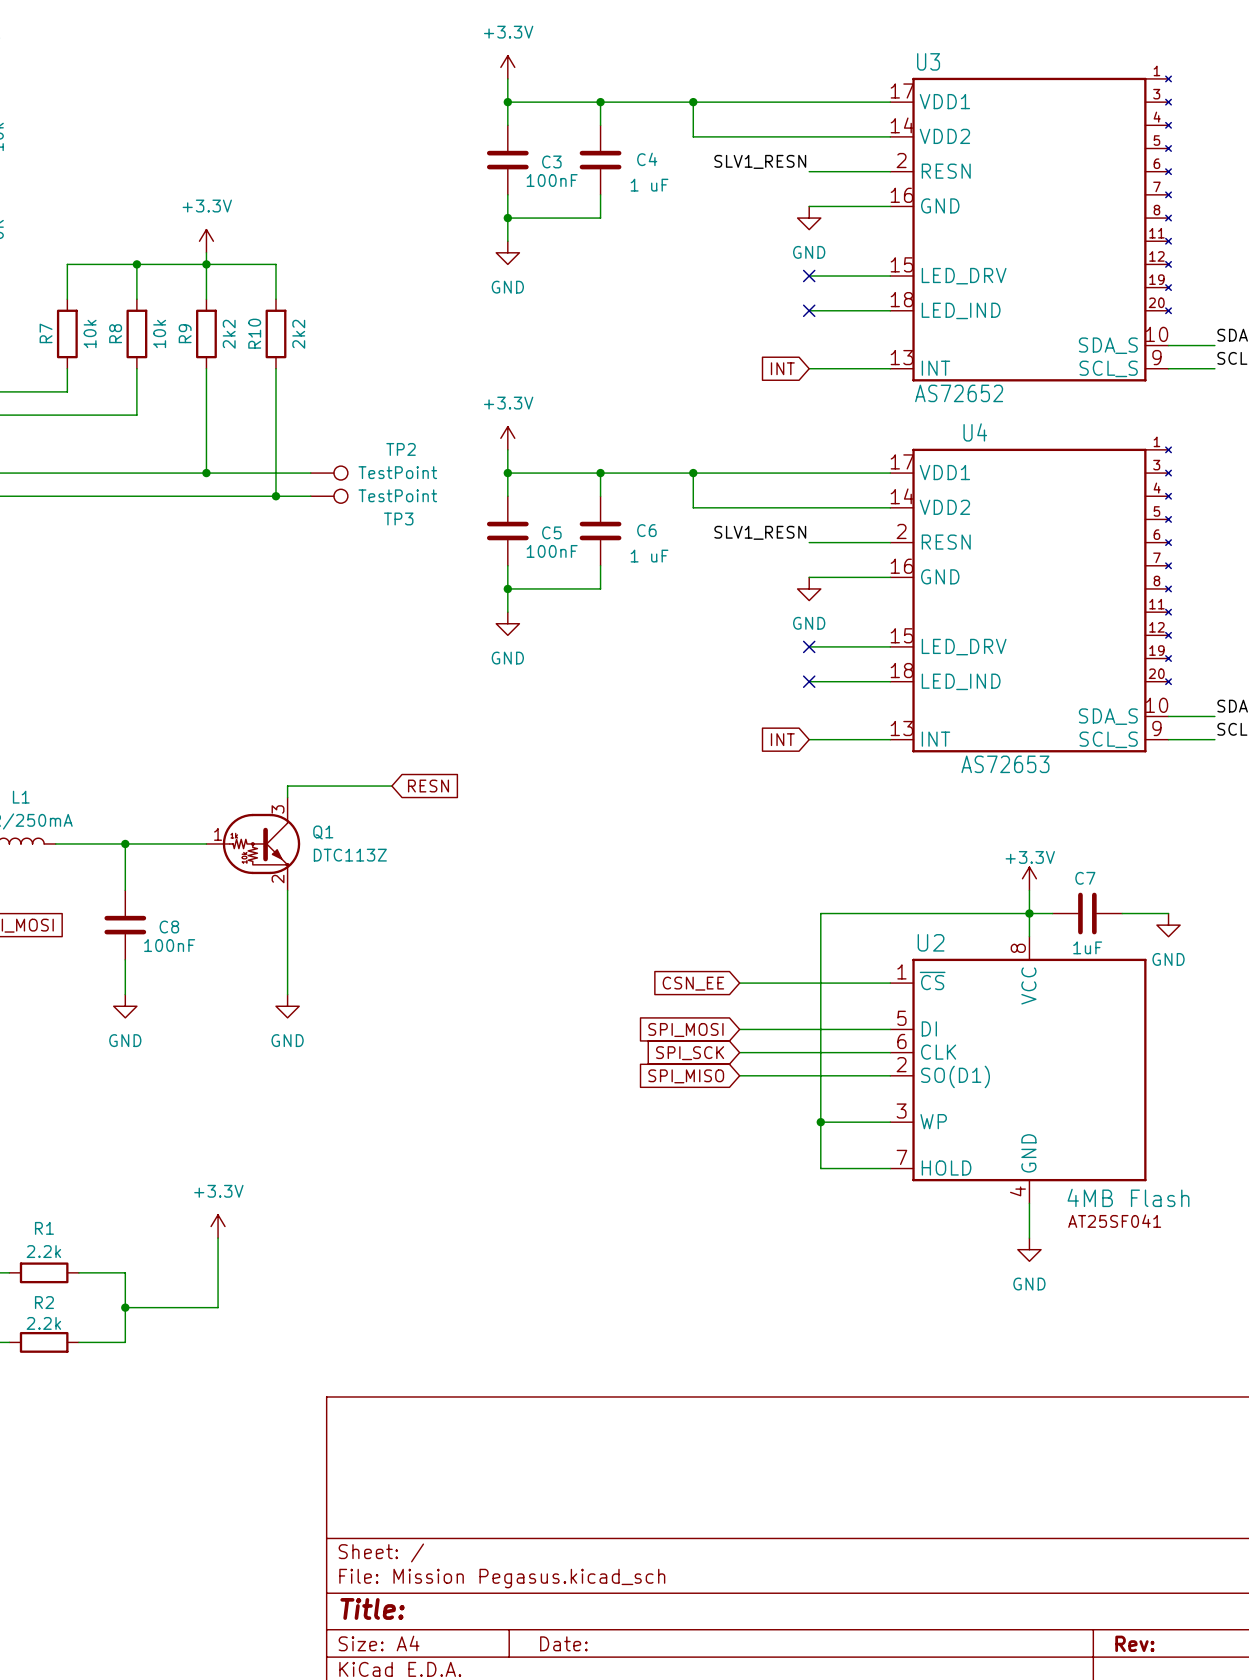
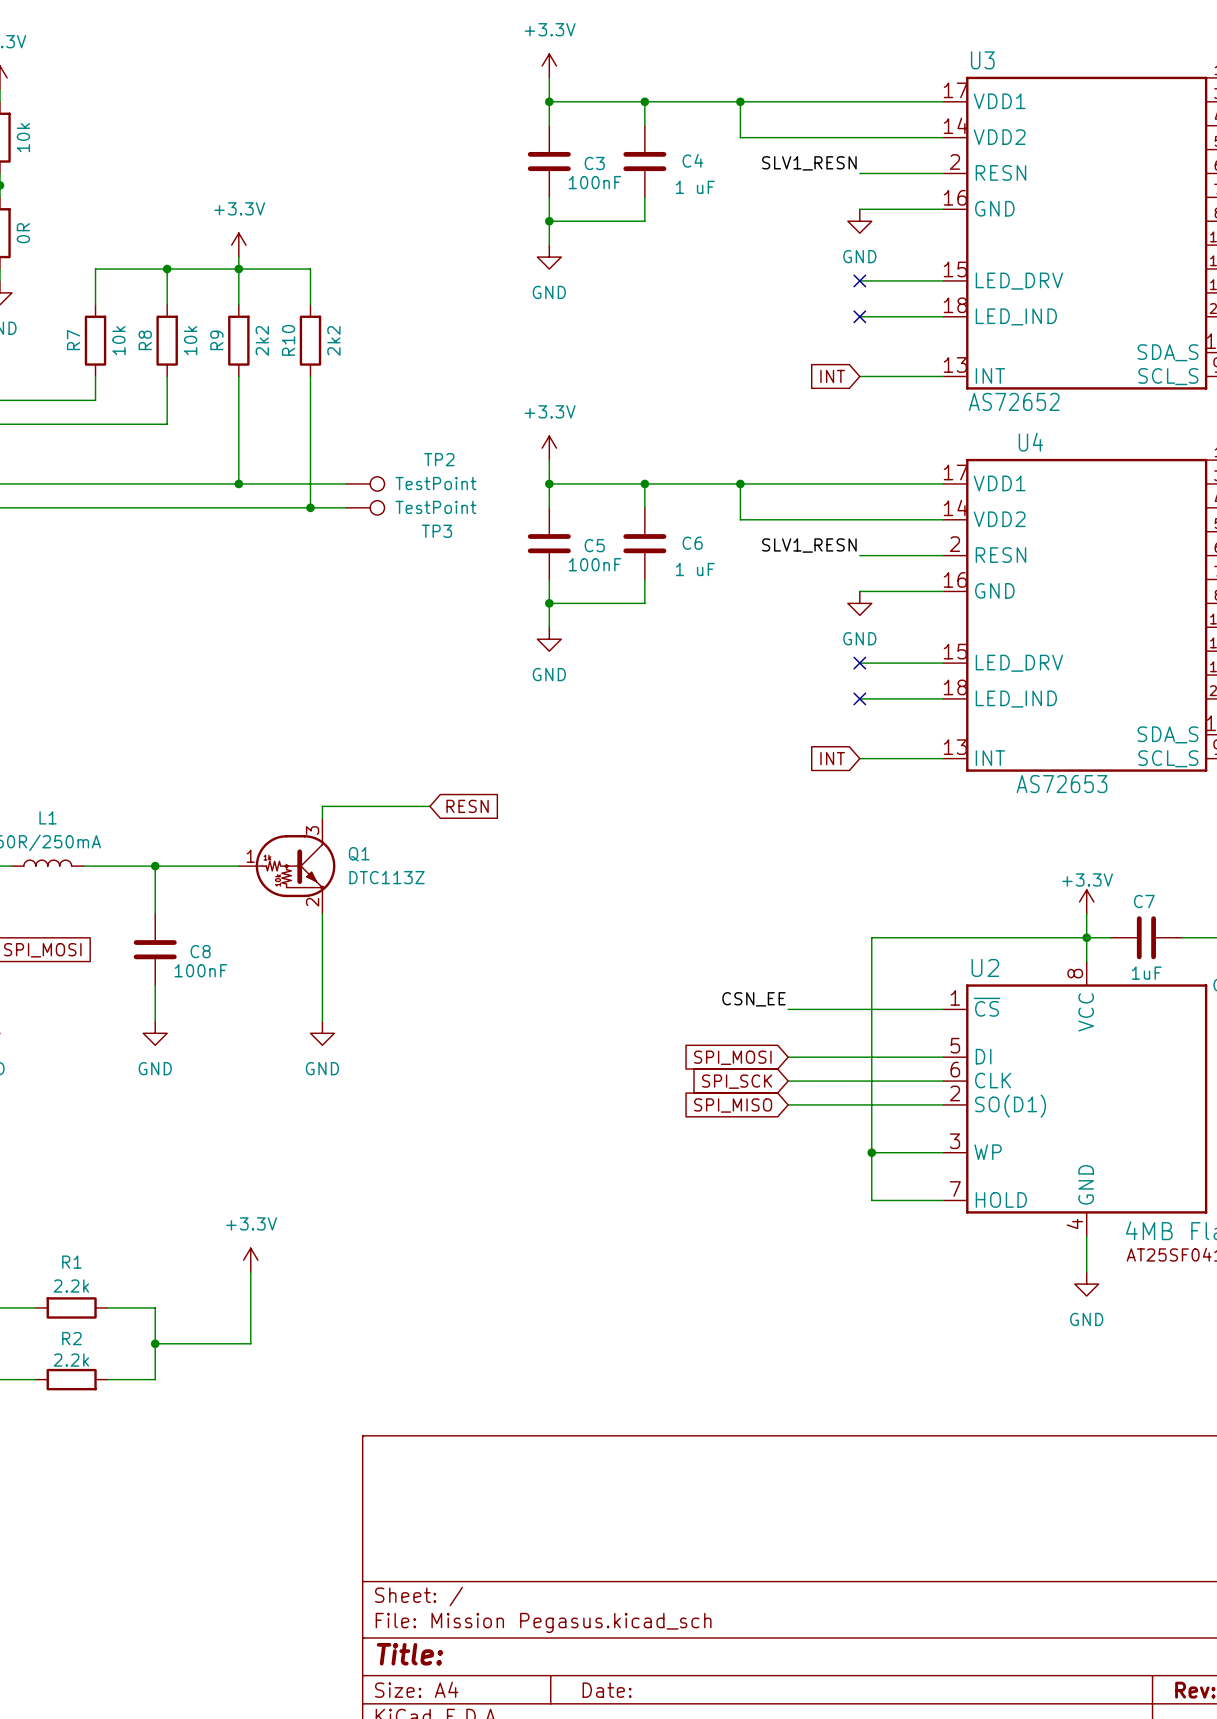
label: none -> CSN_EE (753, 999)
global label: CSN_EE (693, 983) -> none

